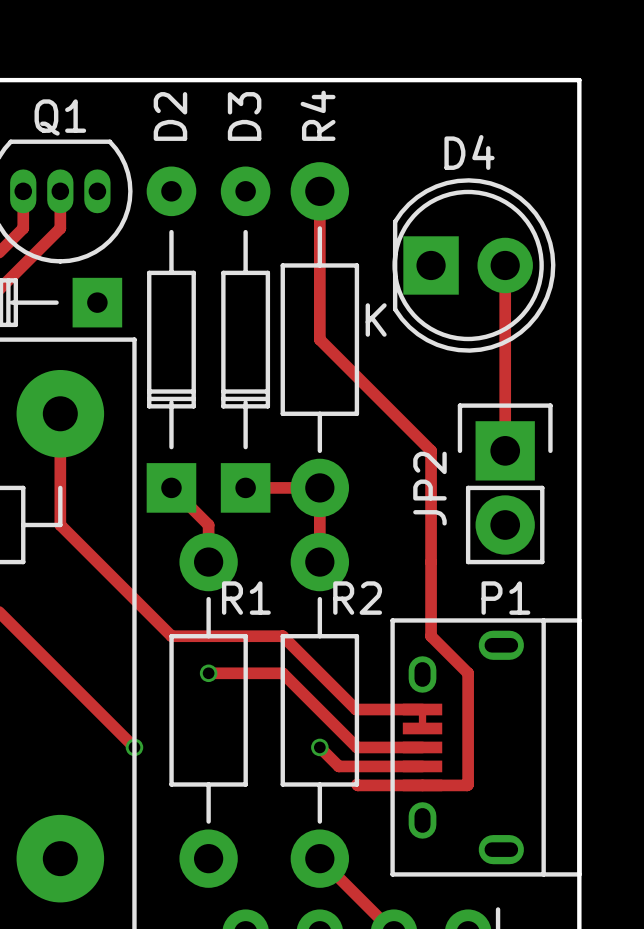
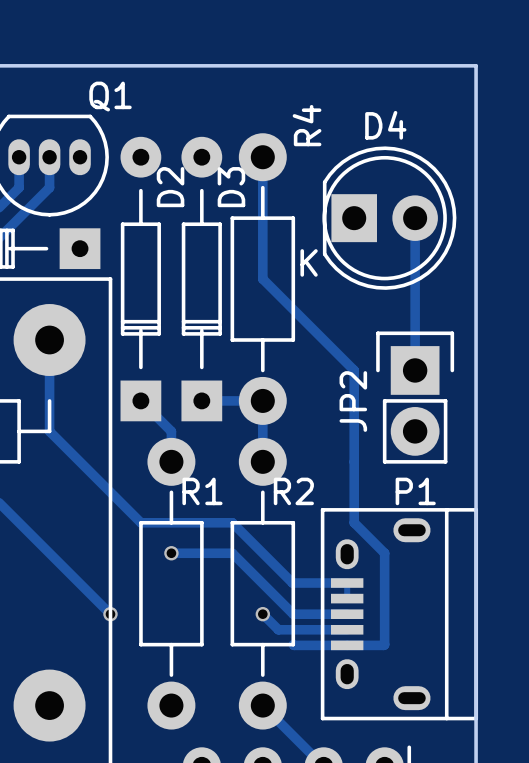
R4 name position: R4 (318, 115) -> R4 (307, 125)
D2 name position: D2 (170, 116) -> D2 (170, 187)
D3 name position: D3 (244, 116) -> D3 (231, 187)
Q1 name position: Q1 (60, 117) -> Q1 (110, 96)

